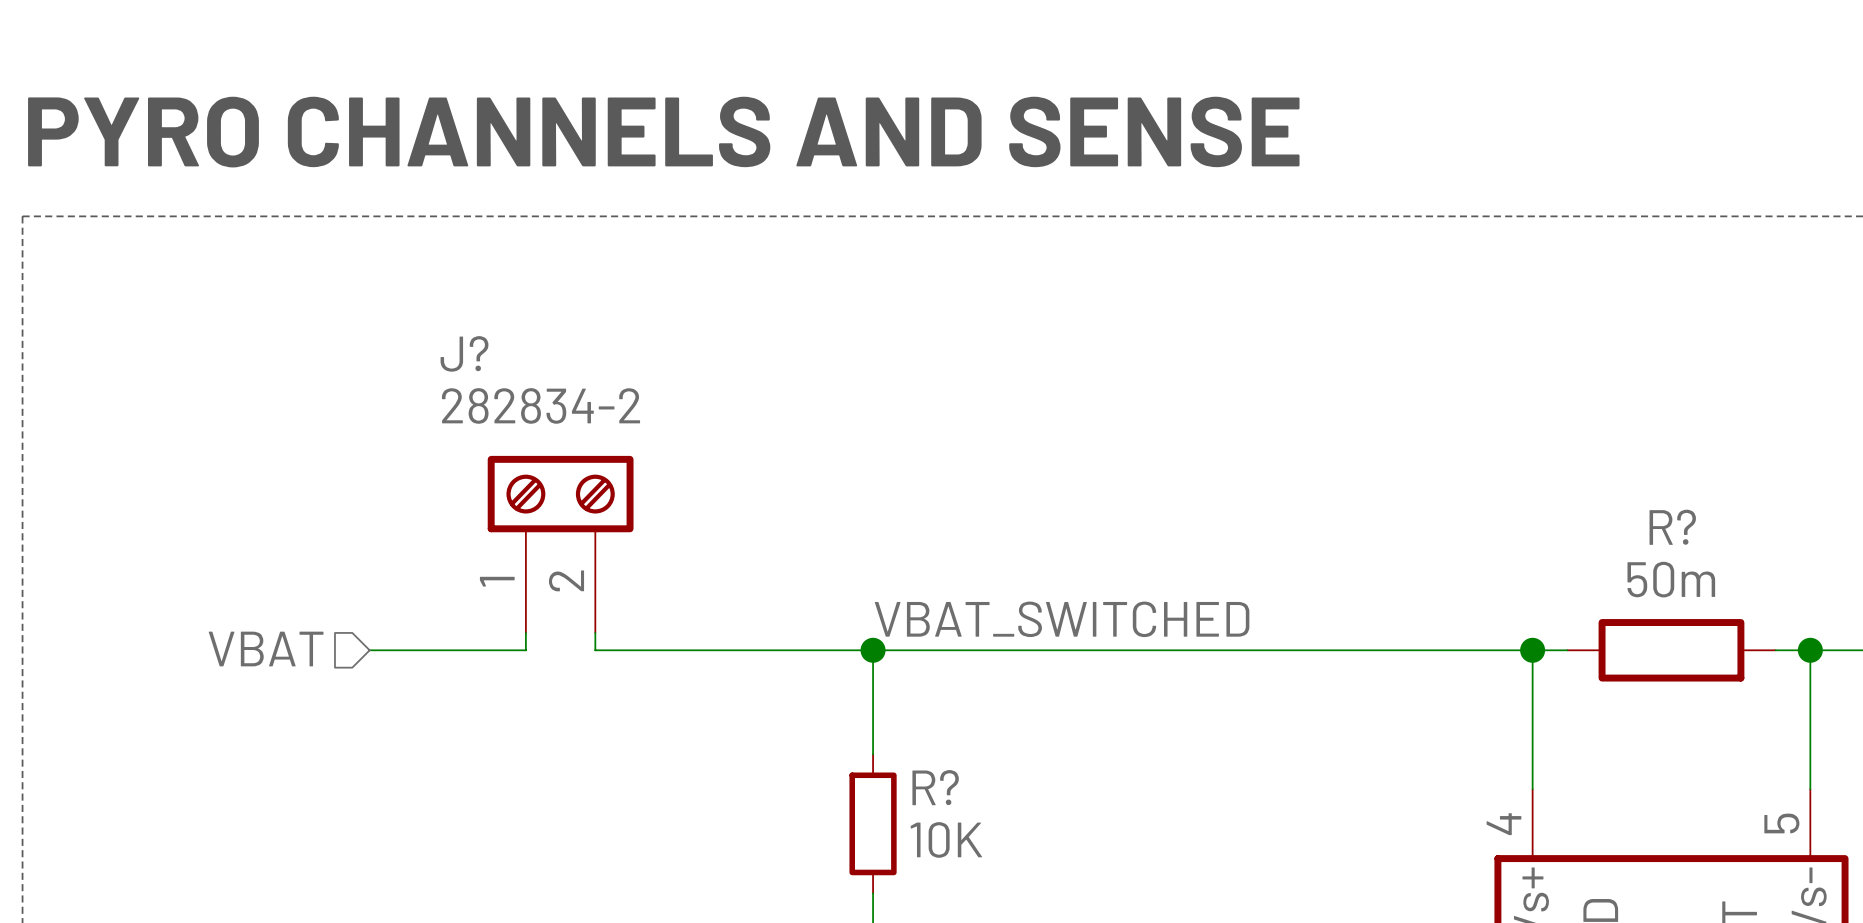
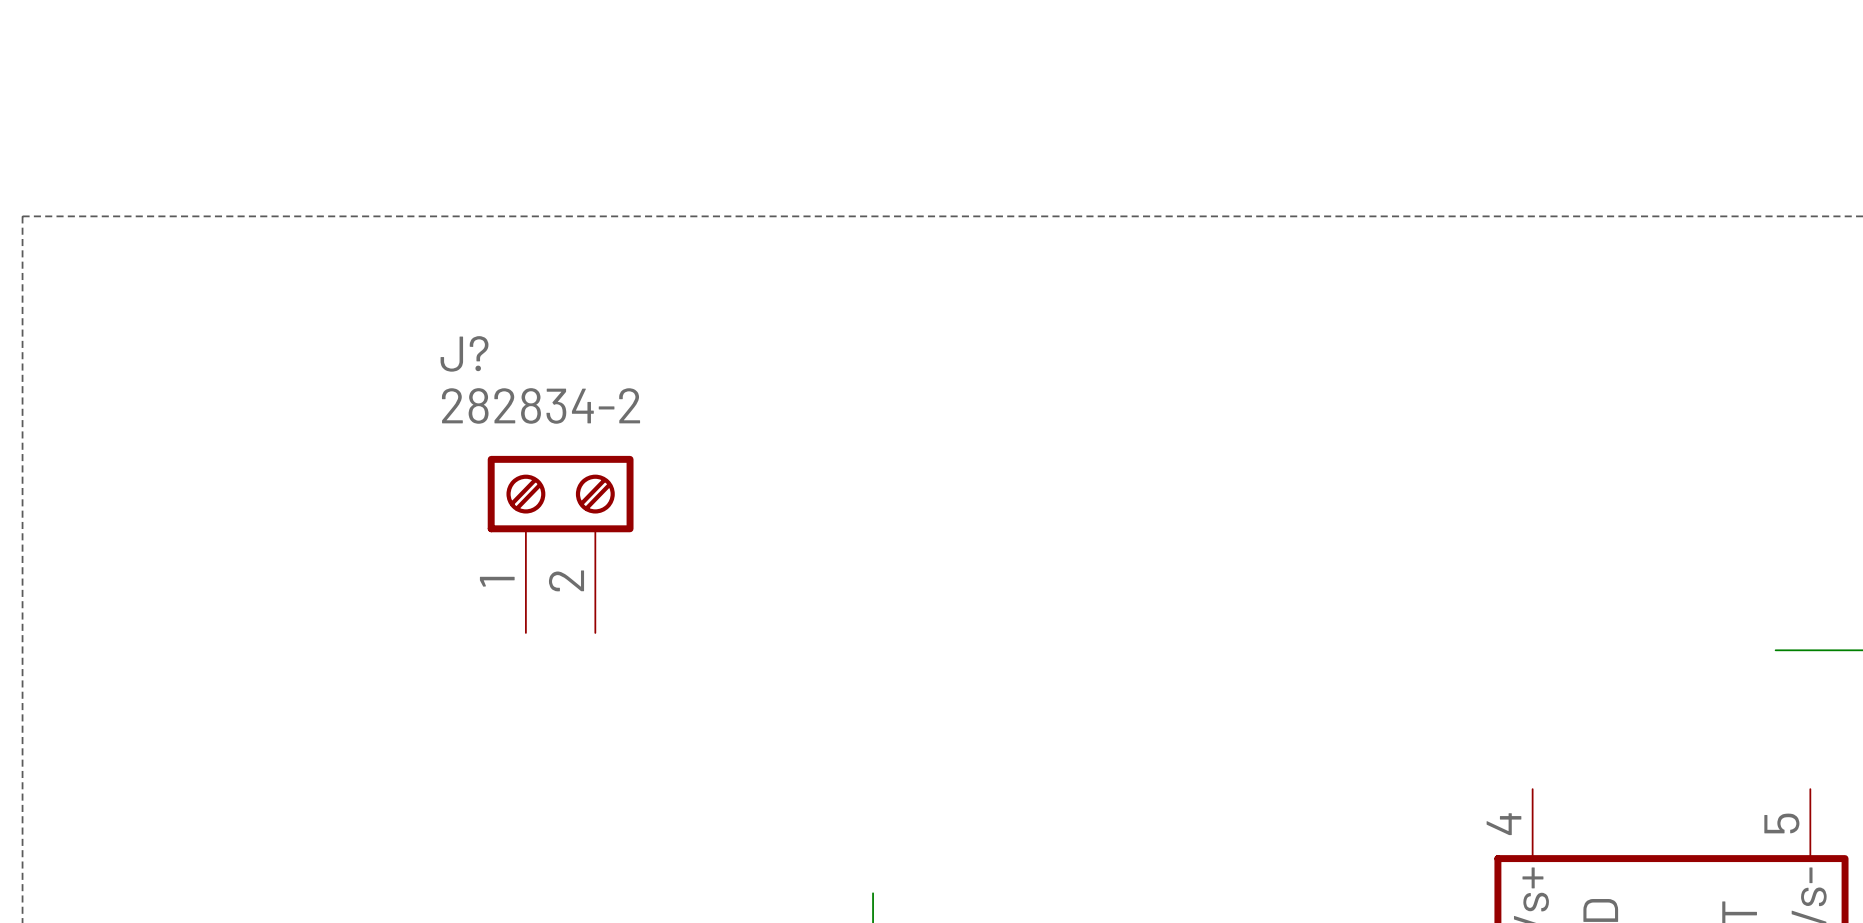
text: PYRO CHANNELS AND SENSE (663, 132) -> none
label: VBAT_SWITCHED (1062, 619) -> none
wire: (525, 632) (525, 650) (369, 650) -> none
wire: (595, 632) (595, 650) (1567, 650) -> none
hierarchical label: VBAT (266, 649) -> none
wire: (873, 650) (873, 754) -> none
junction: (873, 650) -> none
wire: (1532, 650) (1532, 789) -> none
junction: (1532, 650) -> none
R?: 50m (1671, 650) -> none
wire: (1810, 650) (1810, 789) -> none
junction: (1810, 650) -> none
R?: 10K (873, 823) -> none

